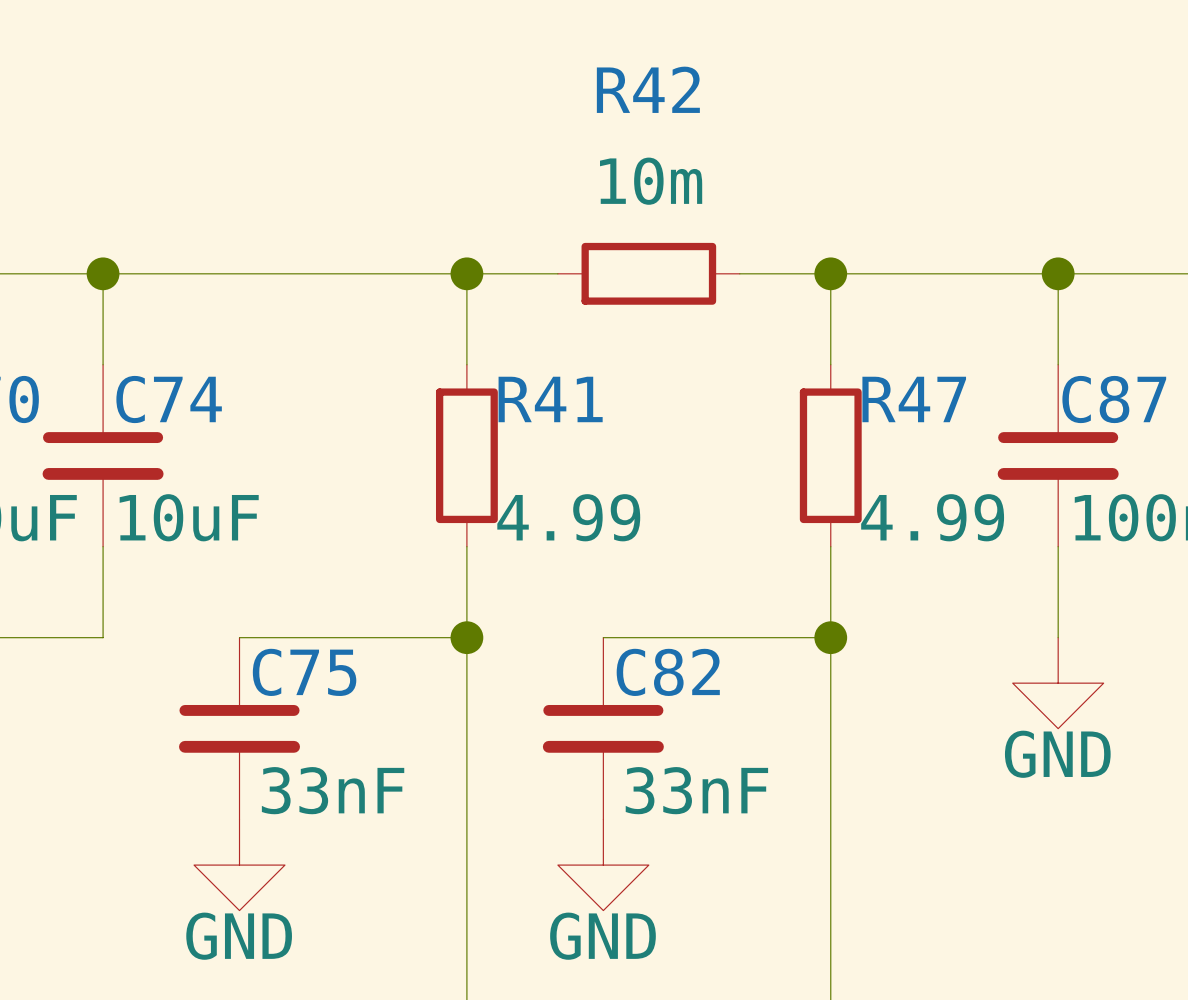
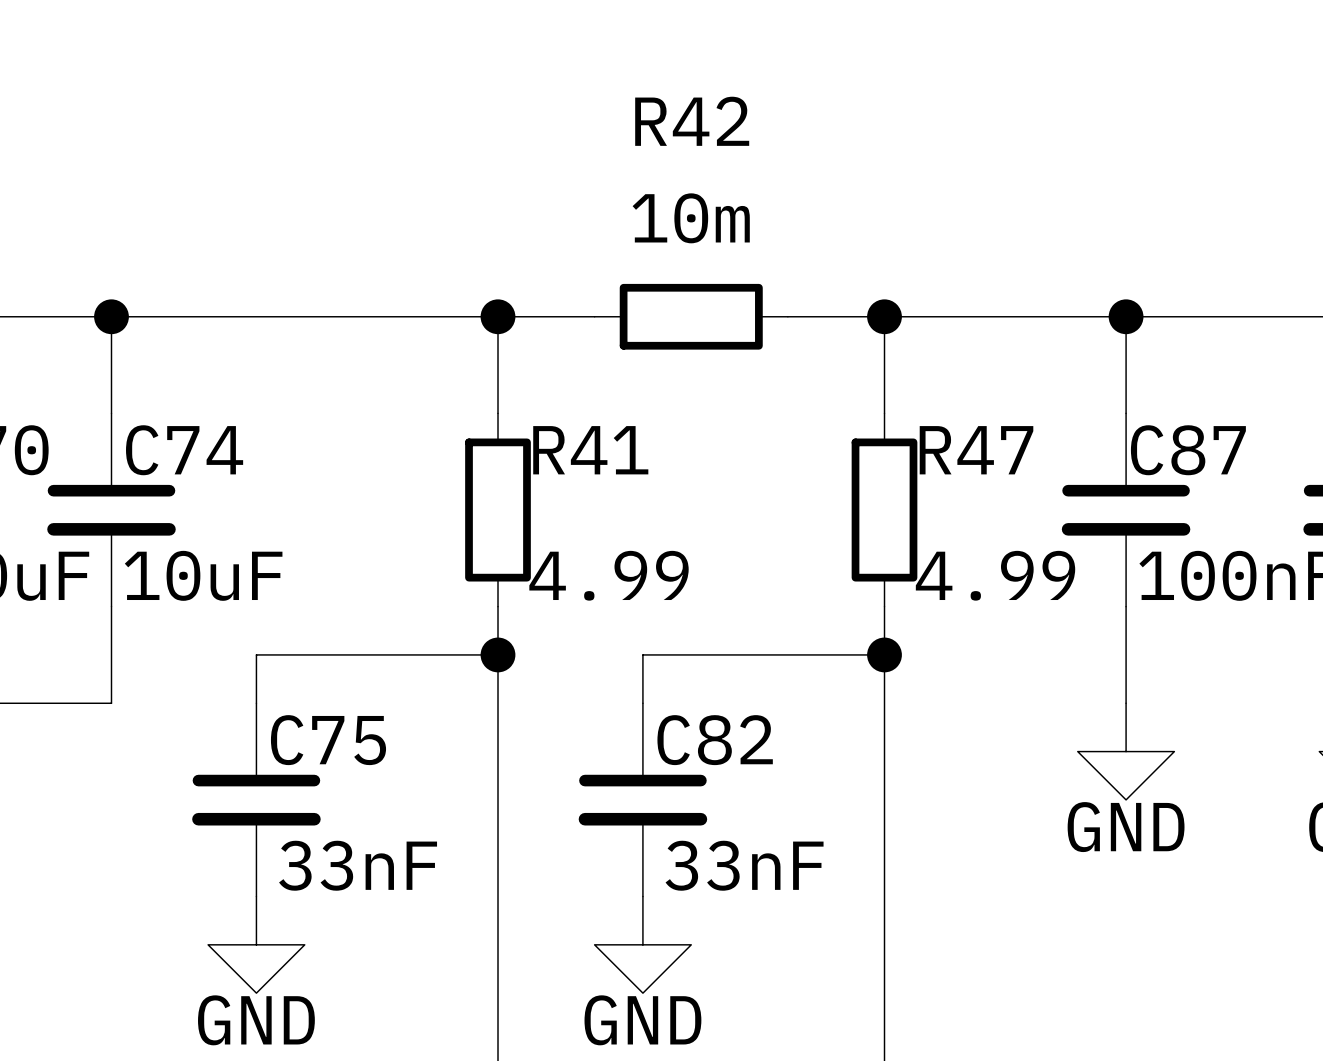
wire: (239, 637) (466, 637) -> (256, 703) (256, 654) (498, 654)
junction position: (466, 637) -> (498, 654)
wire: (603, 637) (830, 637) -> (642, 703) (642, 654) (884, 654)
junction position: (830, 637) -> (884, 654)

